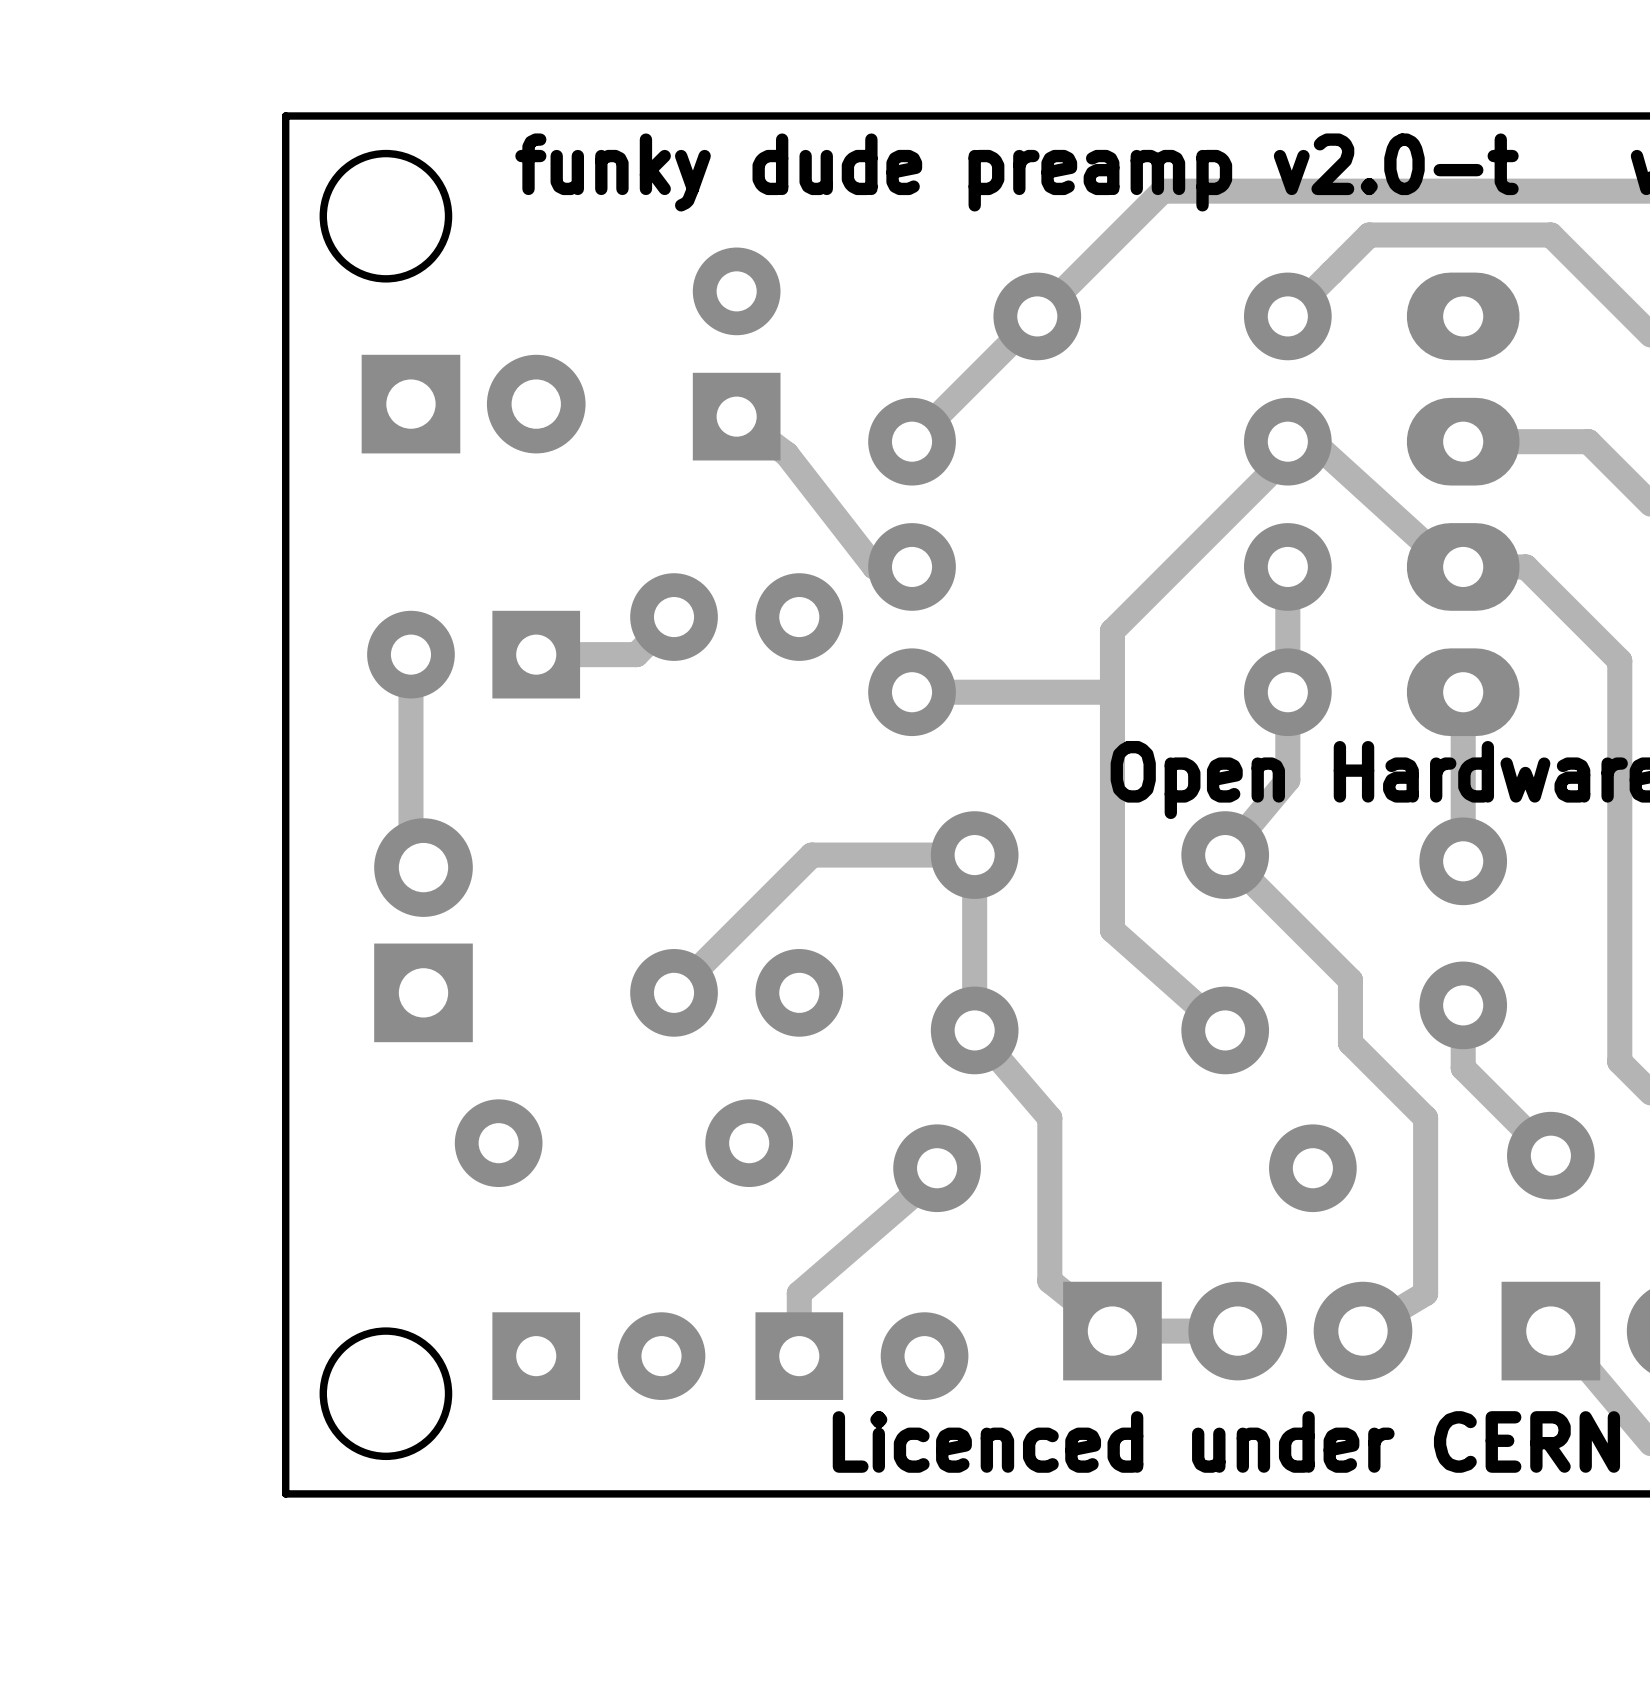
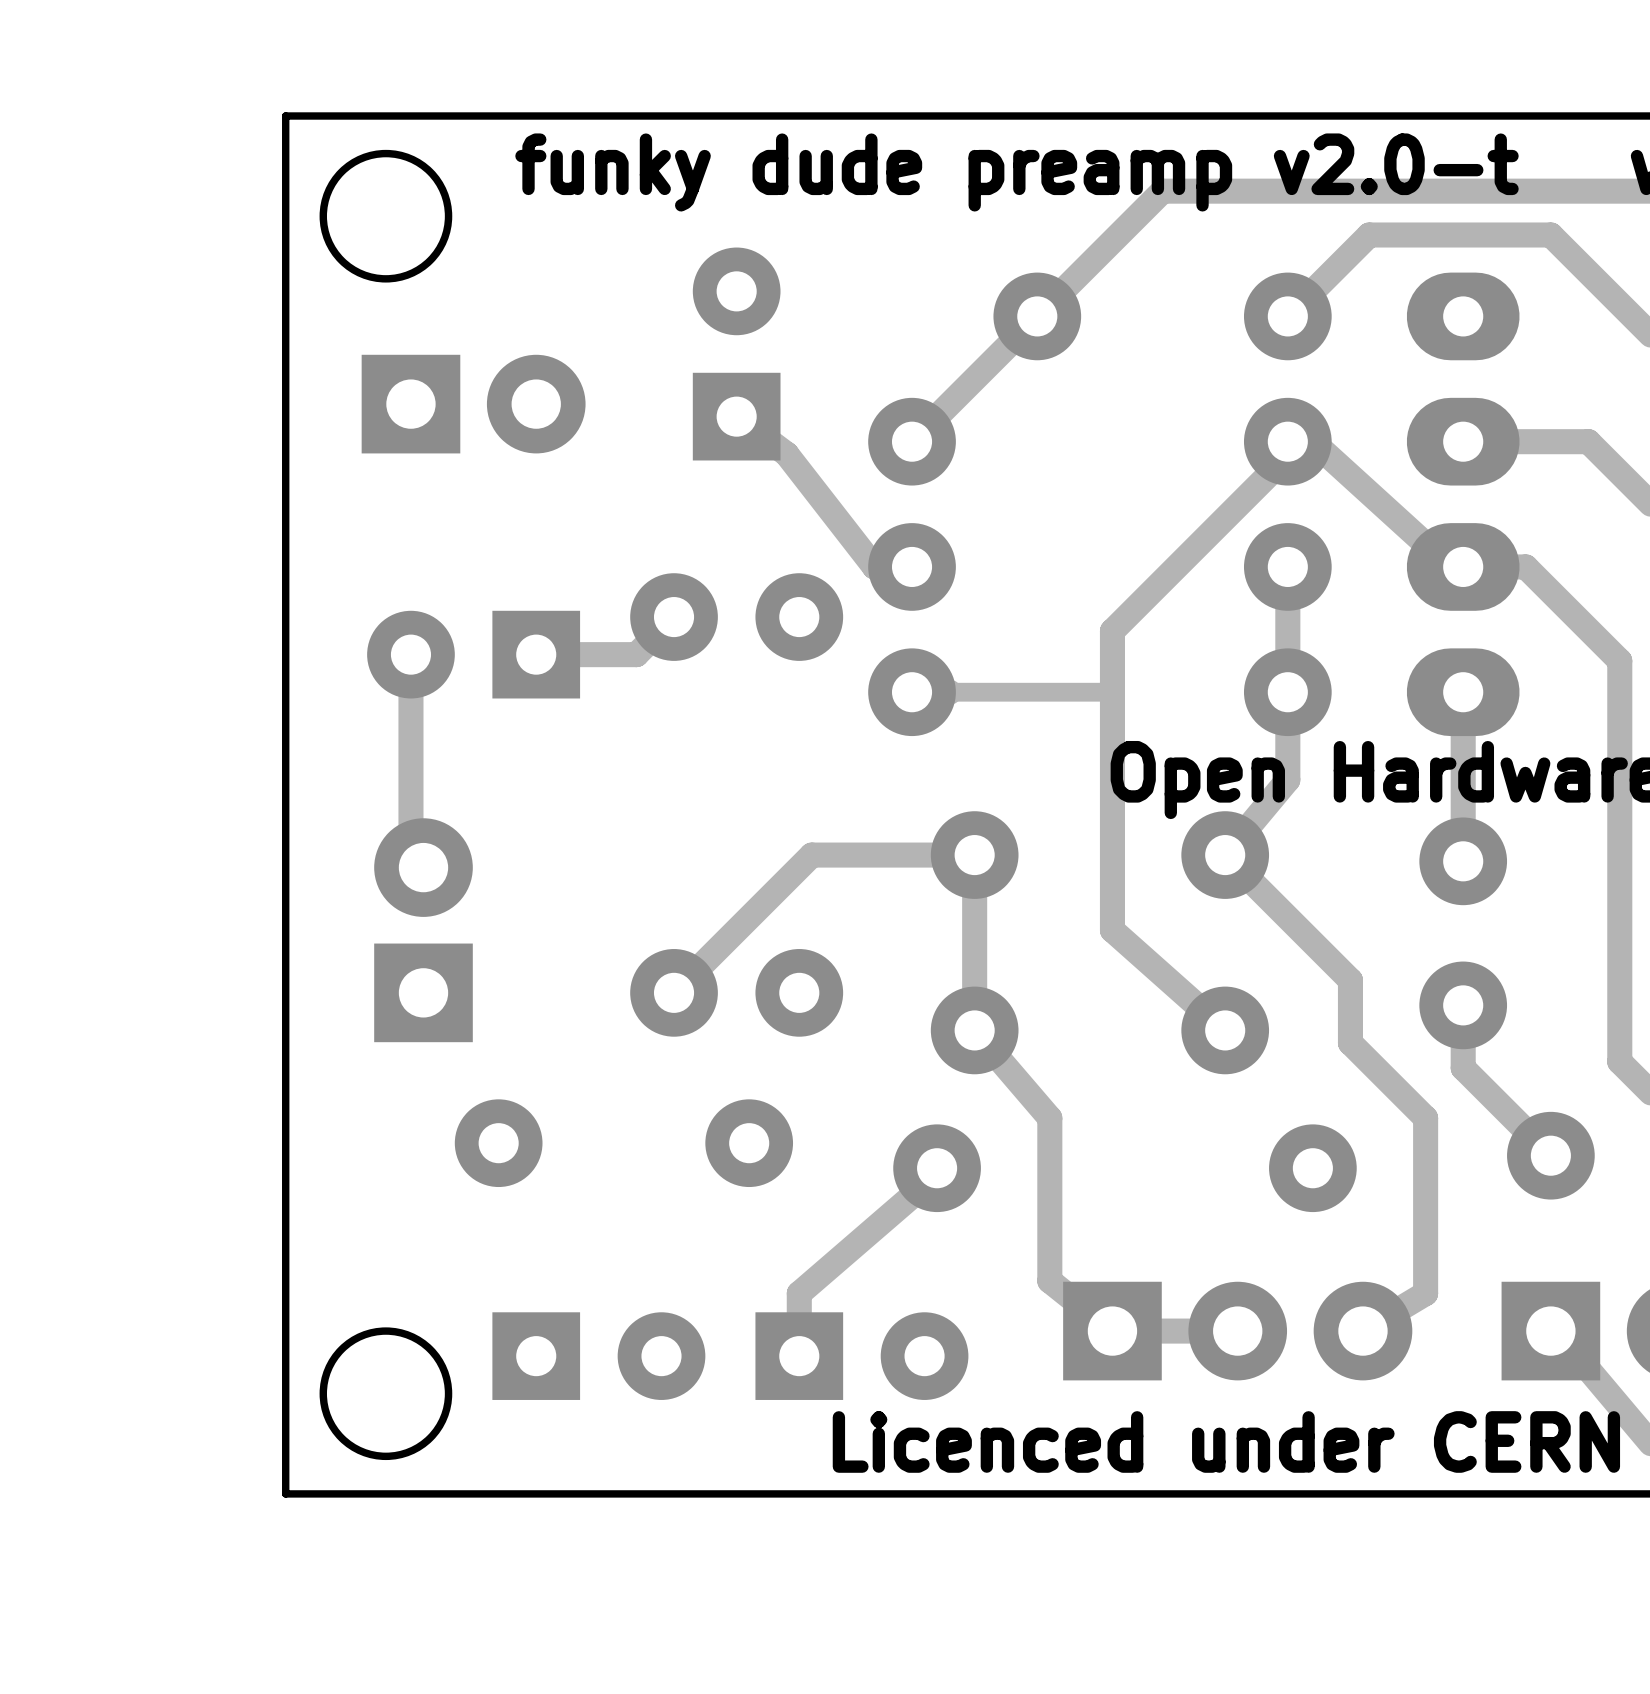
track width: thick (1112, 692) (949, 692) -> thin (1112, 692) (949, 692)

